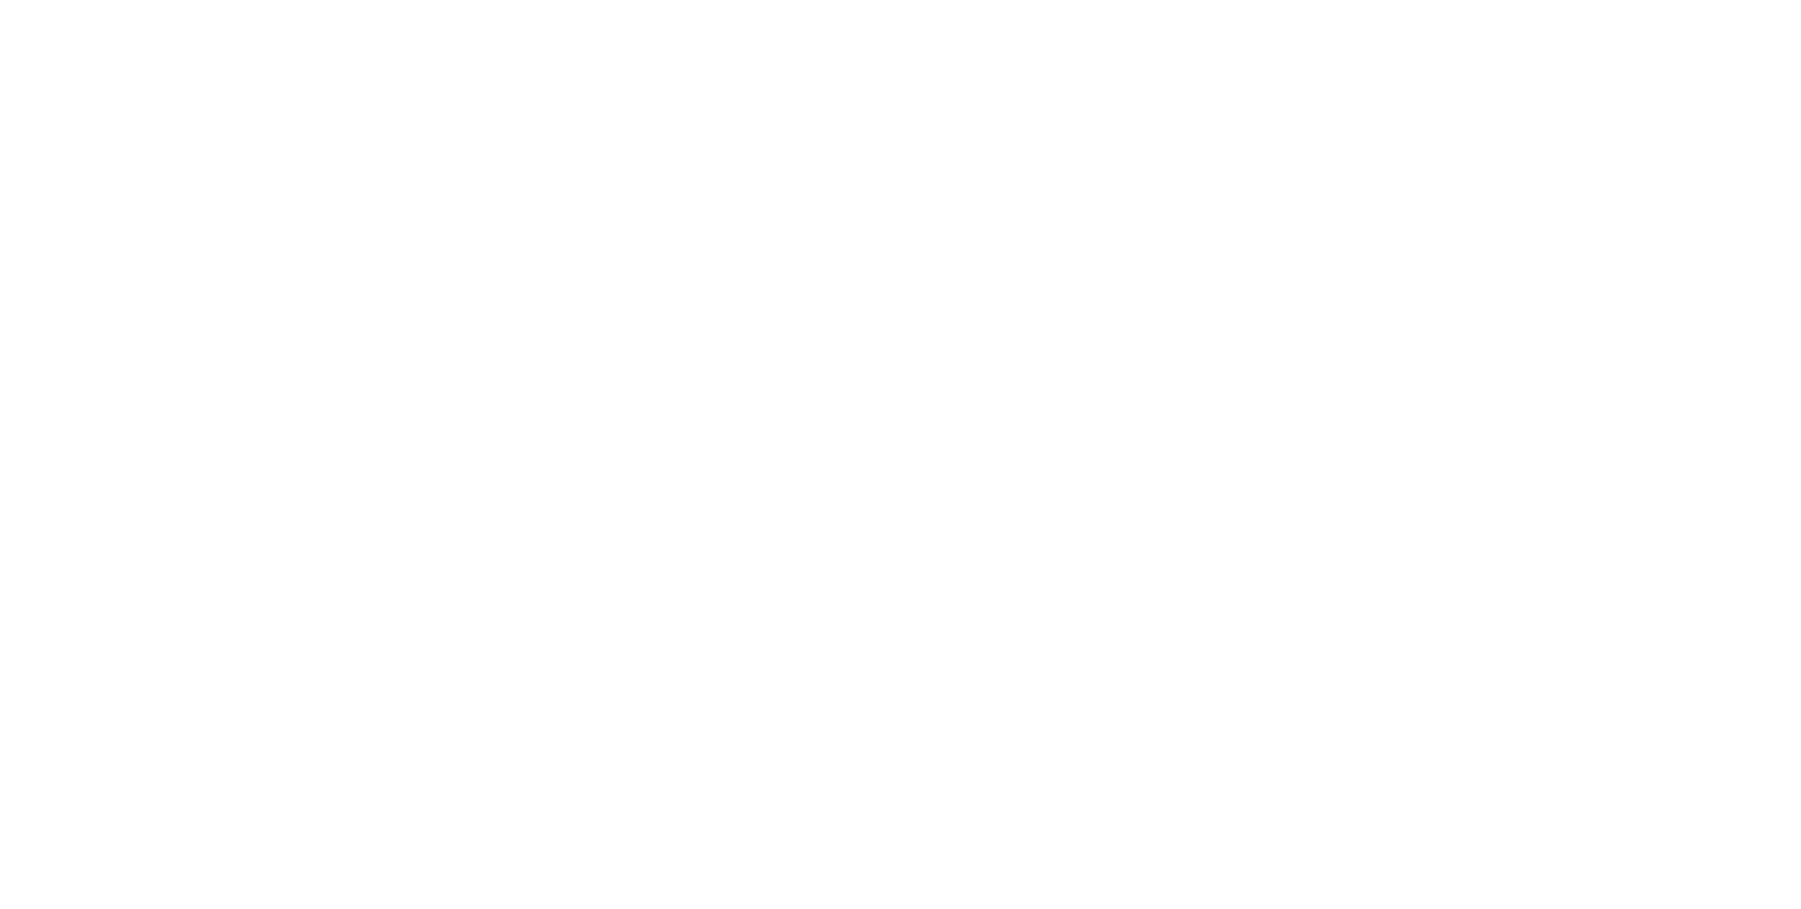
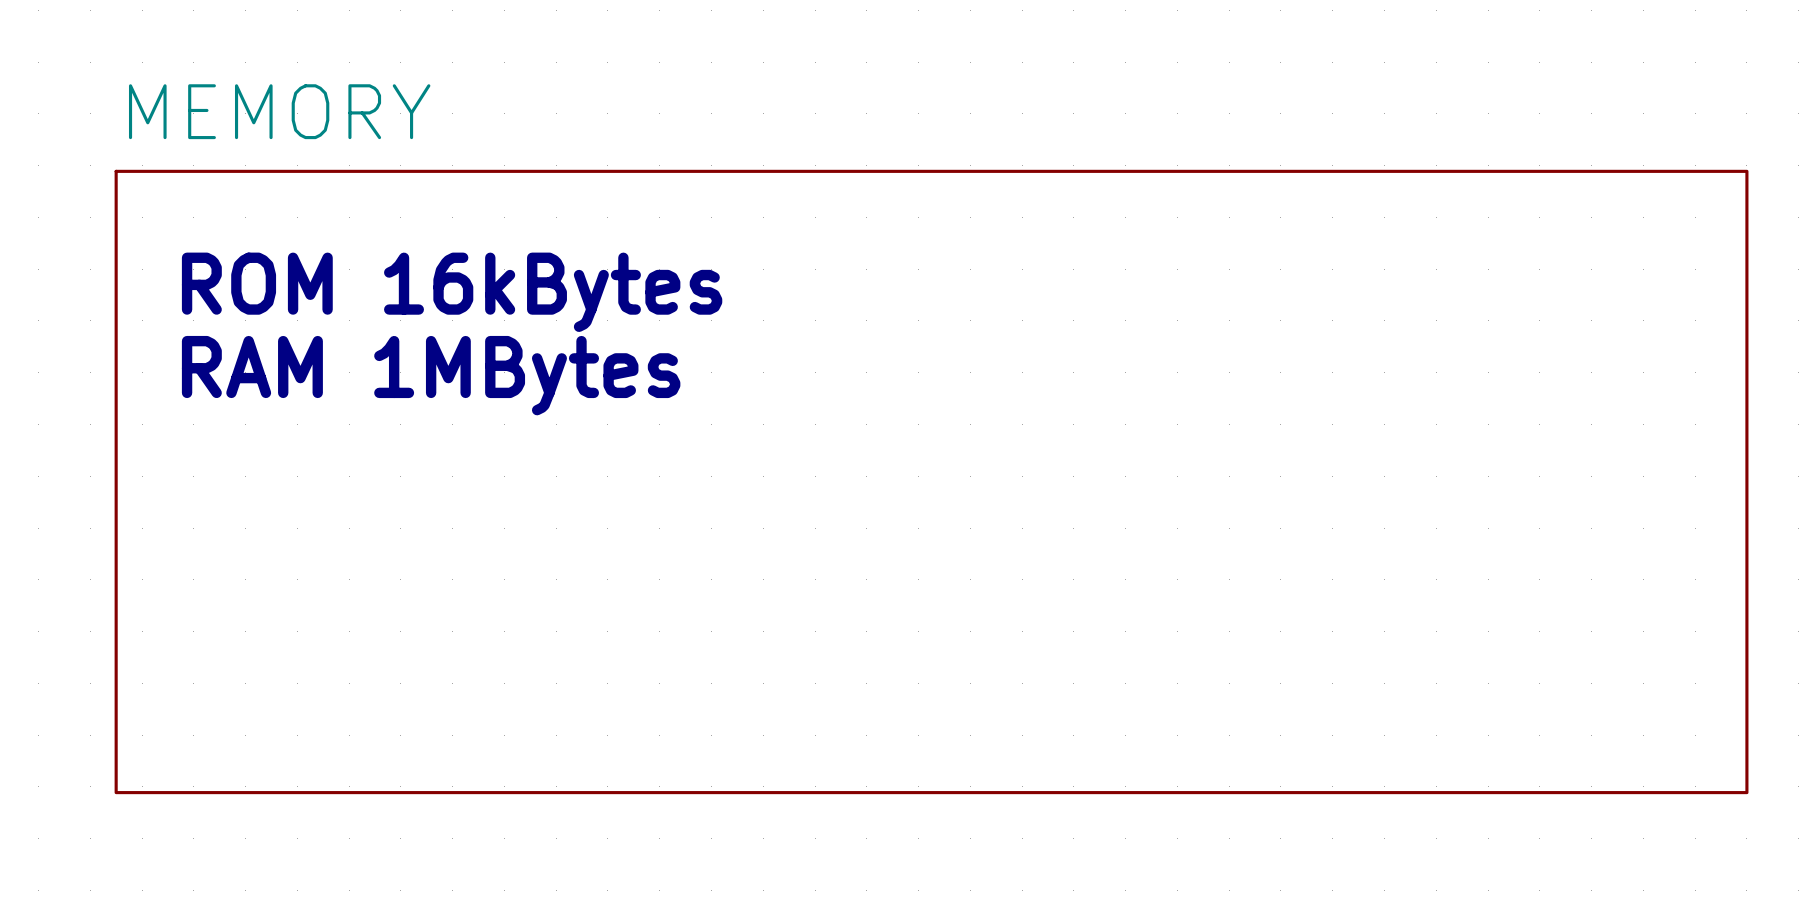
text: none -> ROM 16kBytes (452, 292)
text: none -> RAM 1MBytes (431, 375)
sheet MEMORY: none -> (931, 481)

